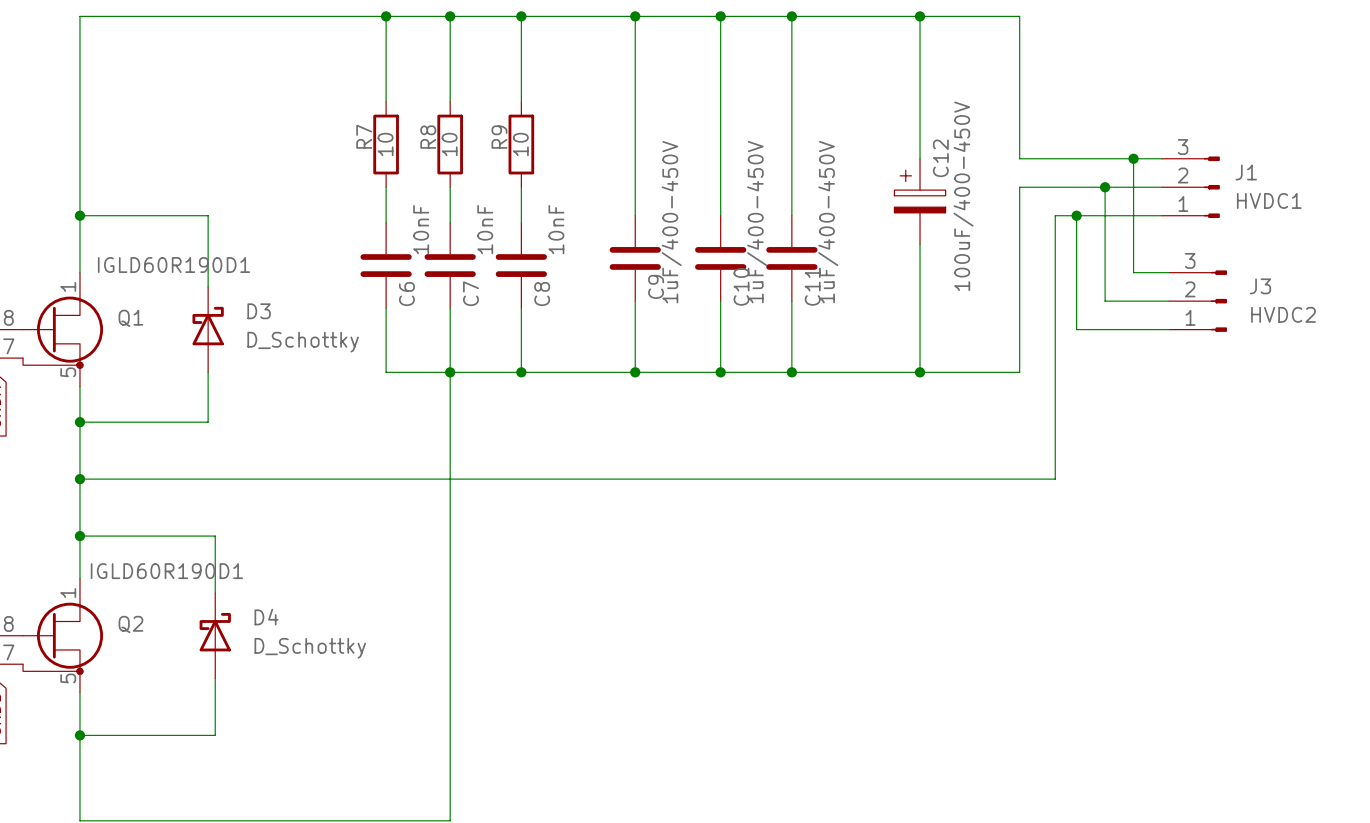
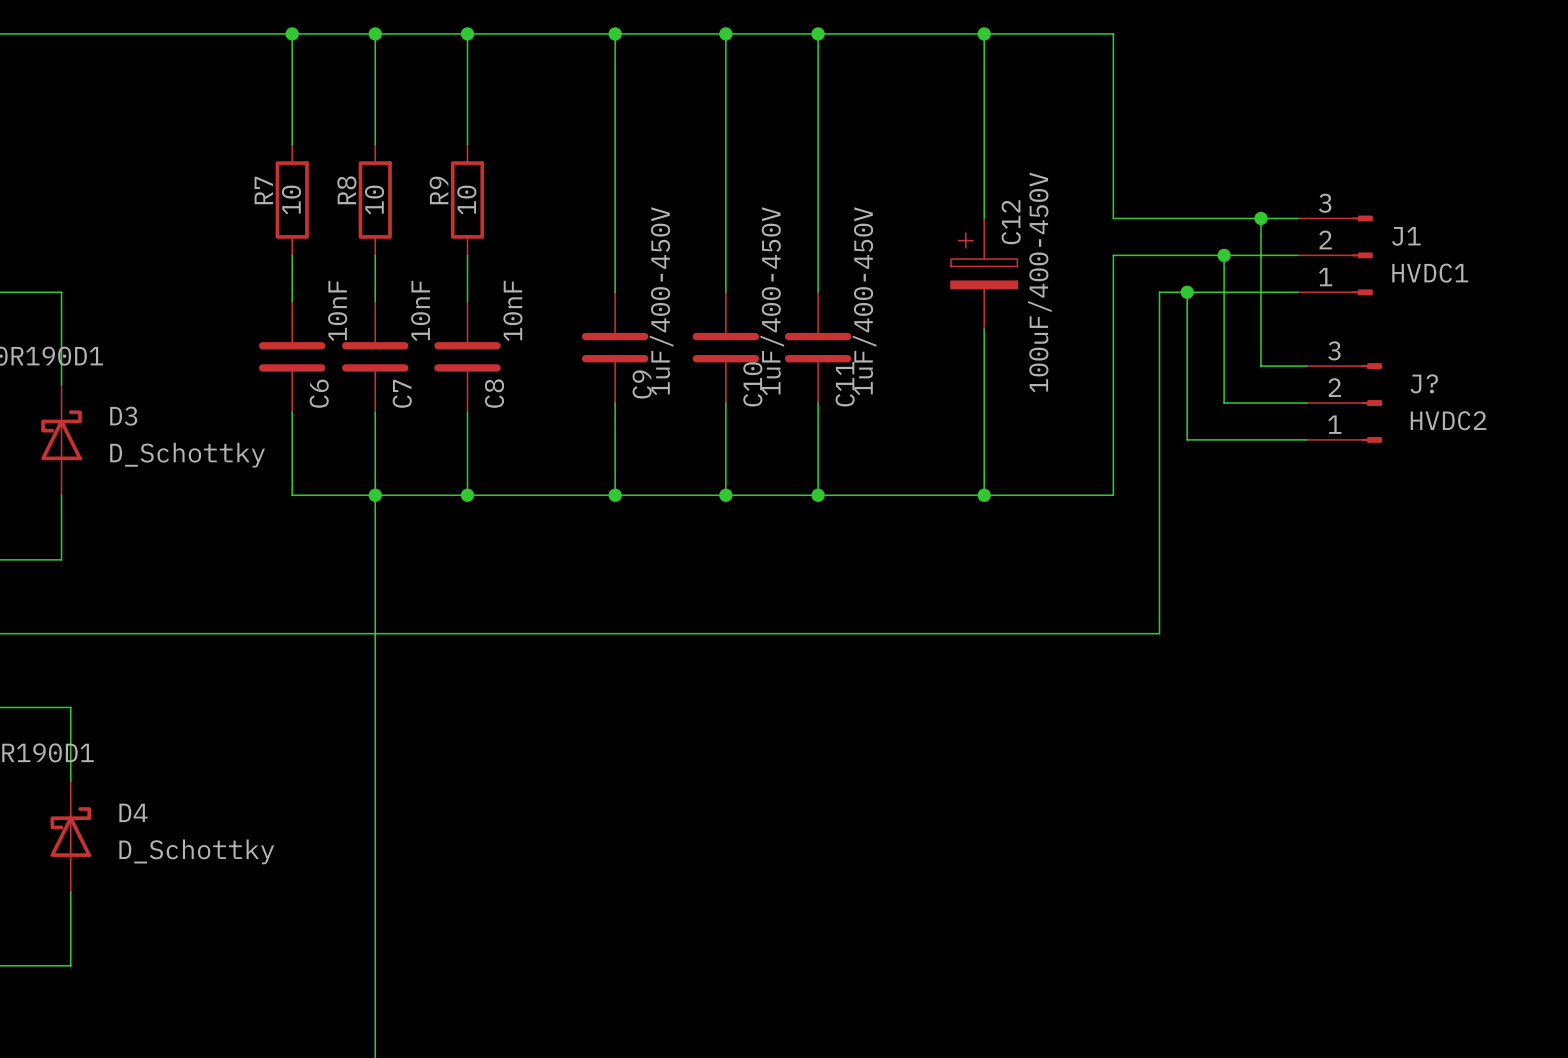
J3 name: J3 (1260, 286) -> J? (1424, 383)

